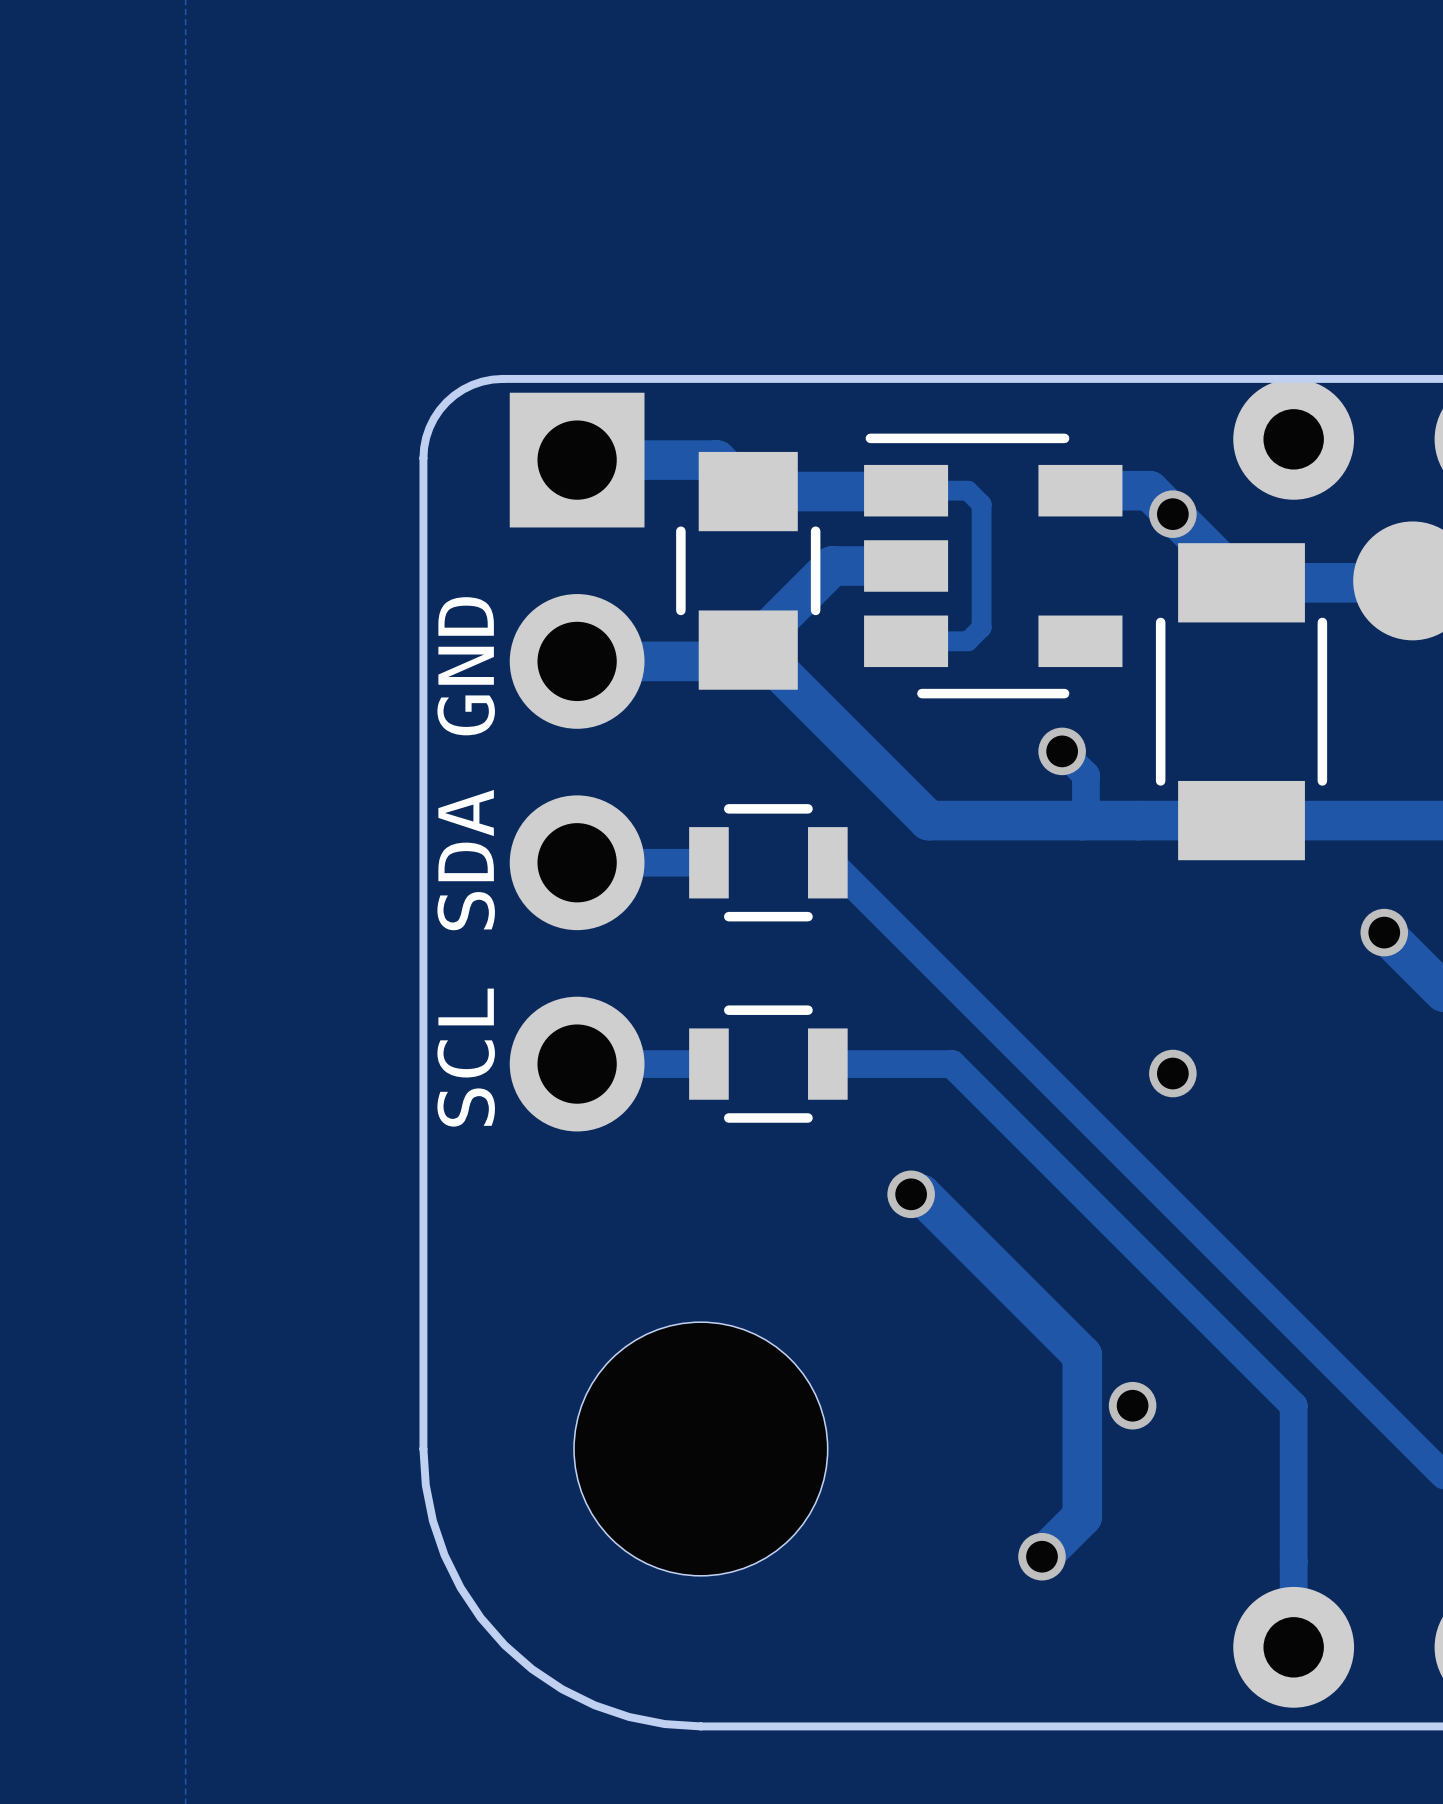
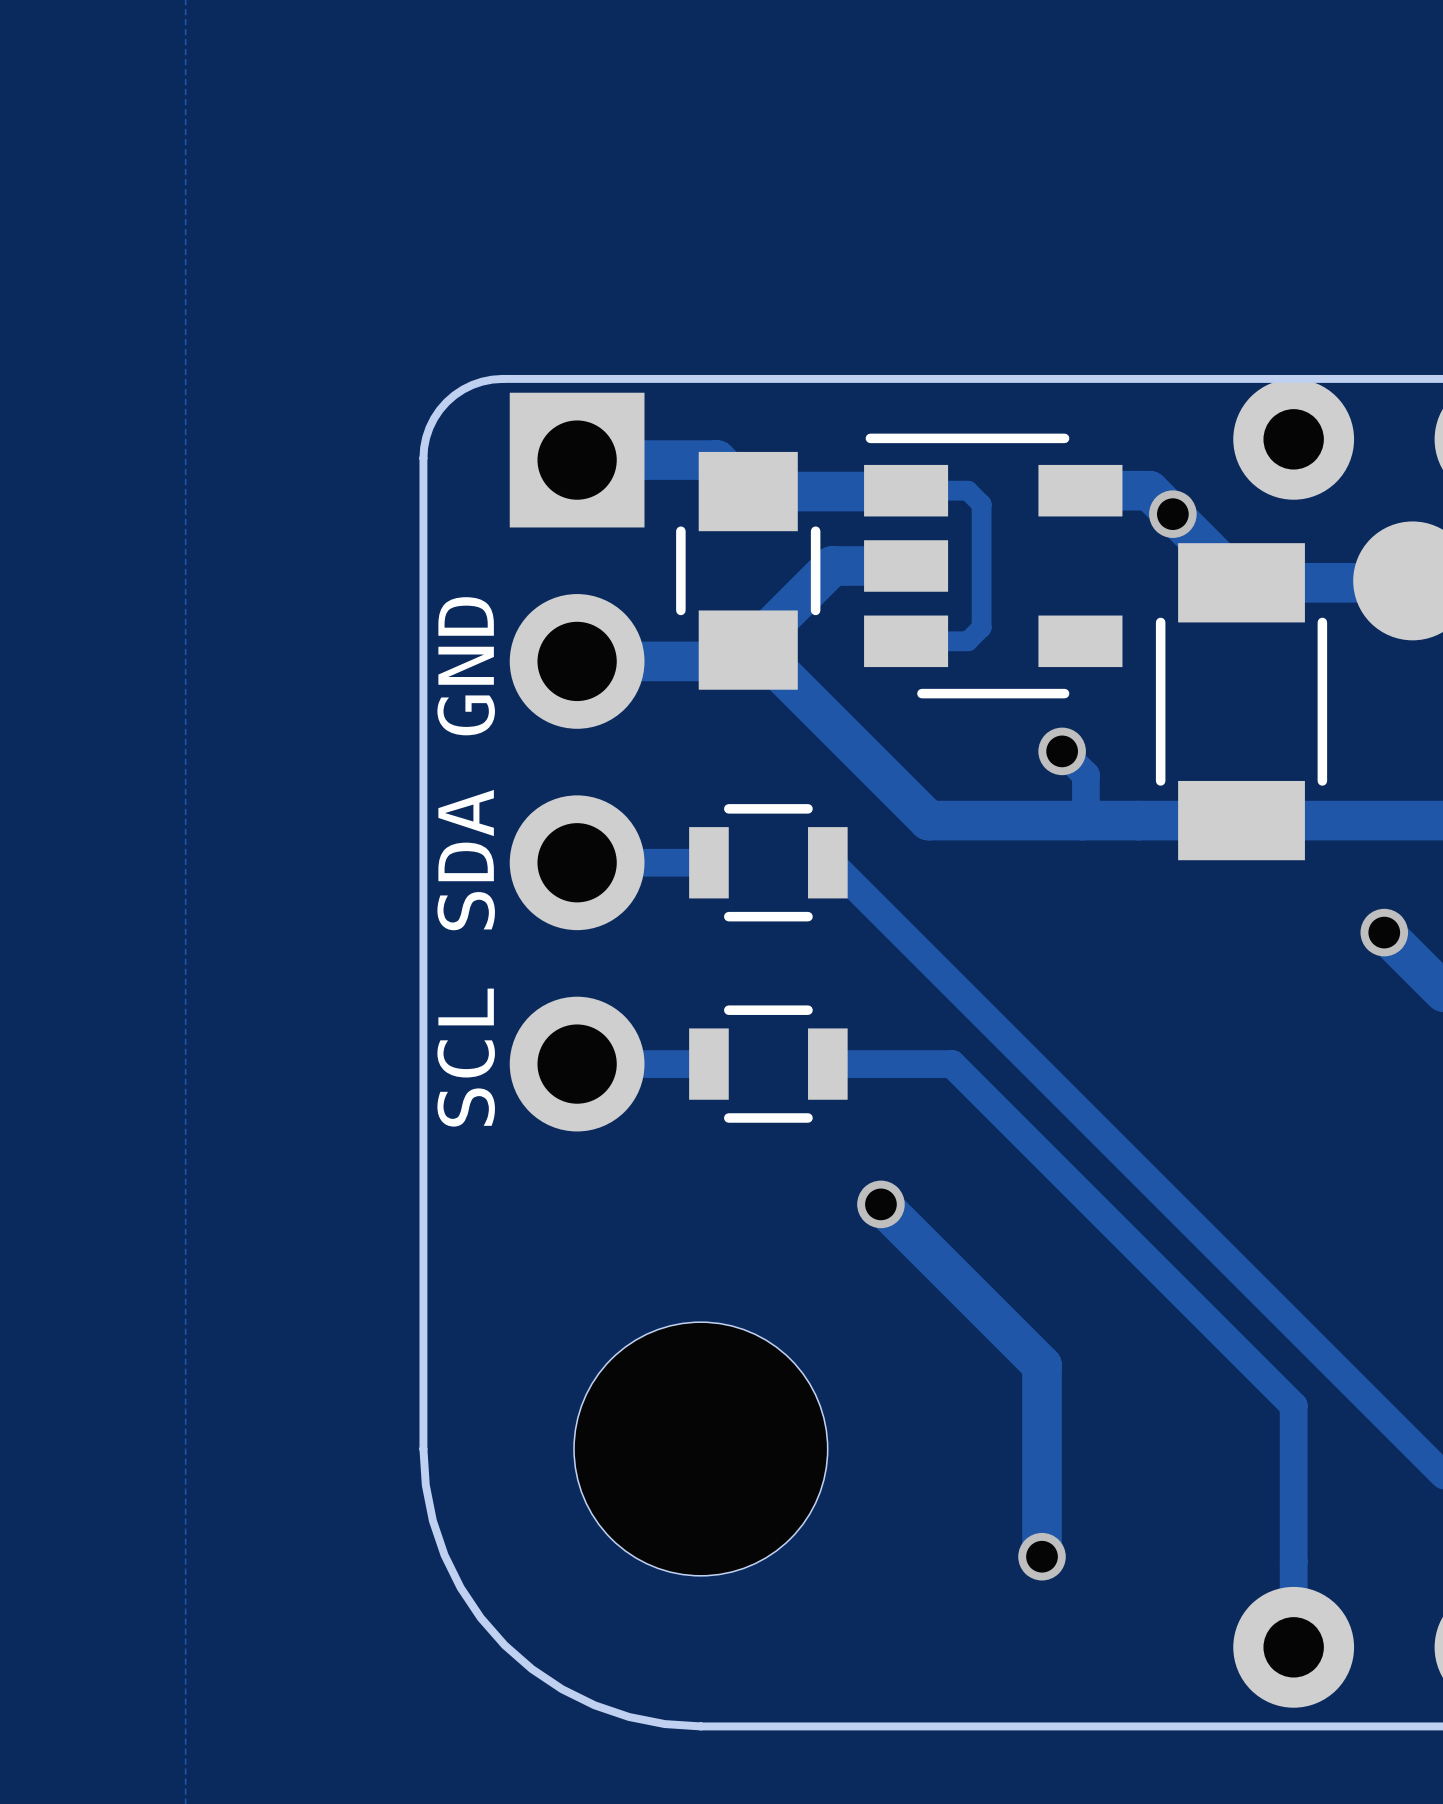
via: (1172, 1073) -> none
track: (911, 1194) (921, 1194) (1082, 1355) (1082, 1516) (1042, 1556) -> (880, 1204) (1042, 1365) (1042, 1556)
via position: (911, 1194) -> (880, 1204)
via: (1132, 1405) -> none

